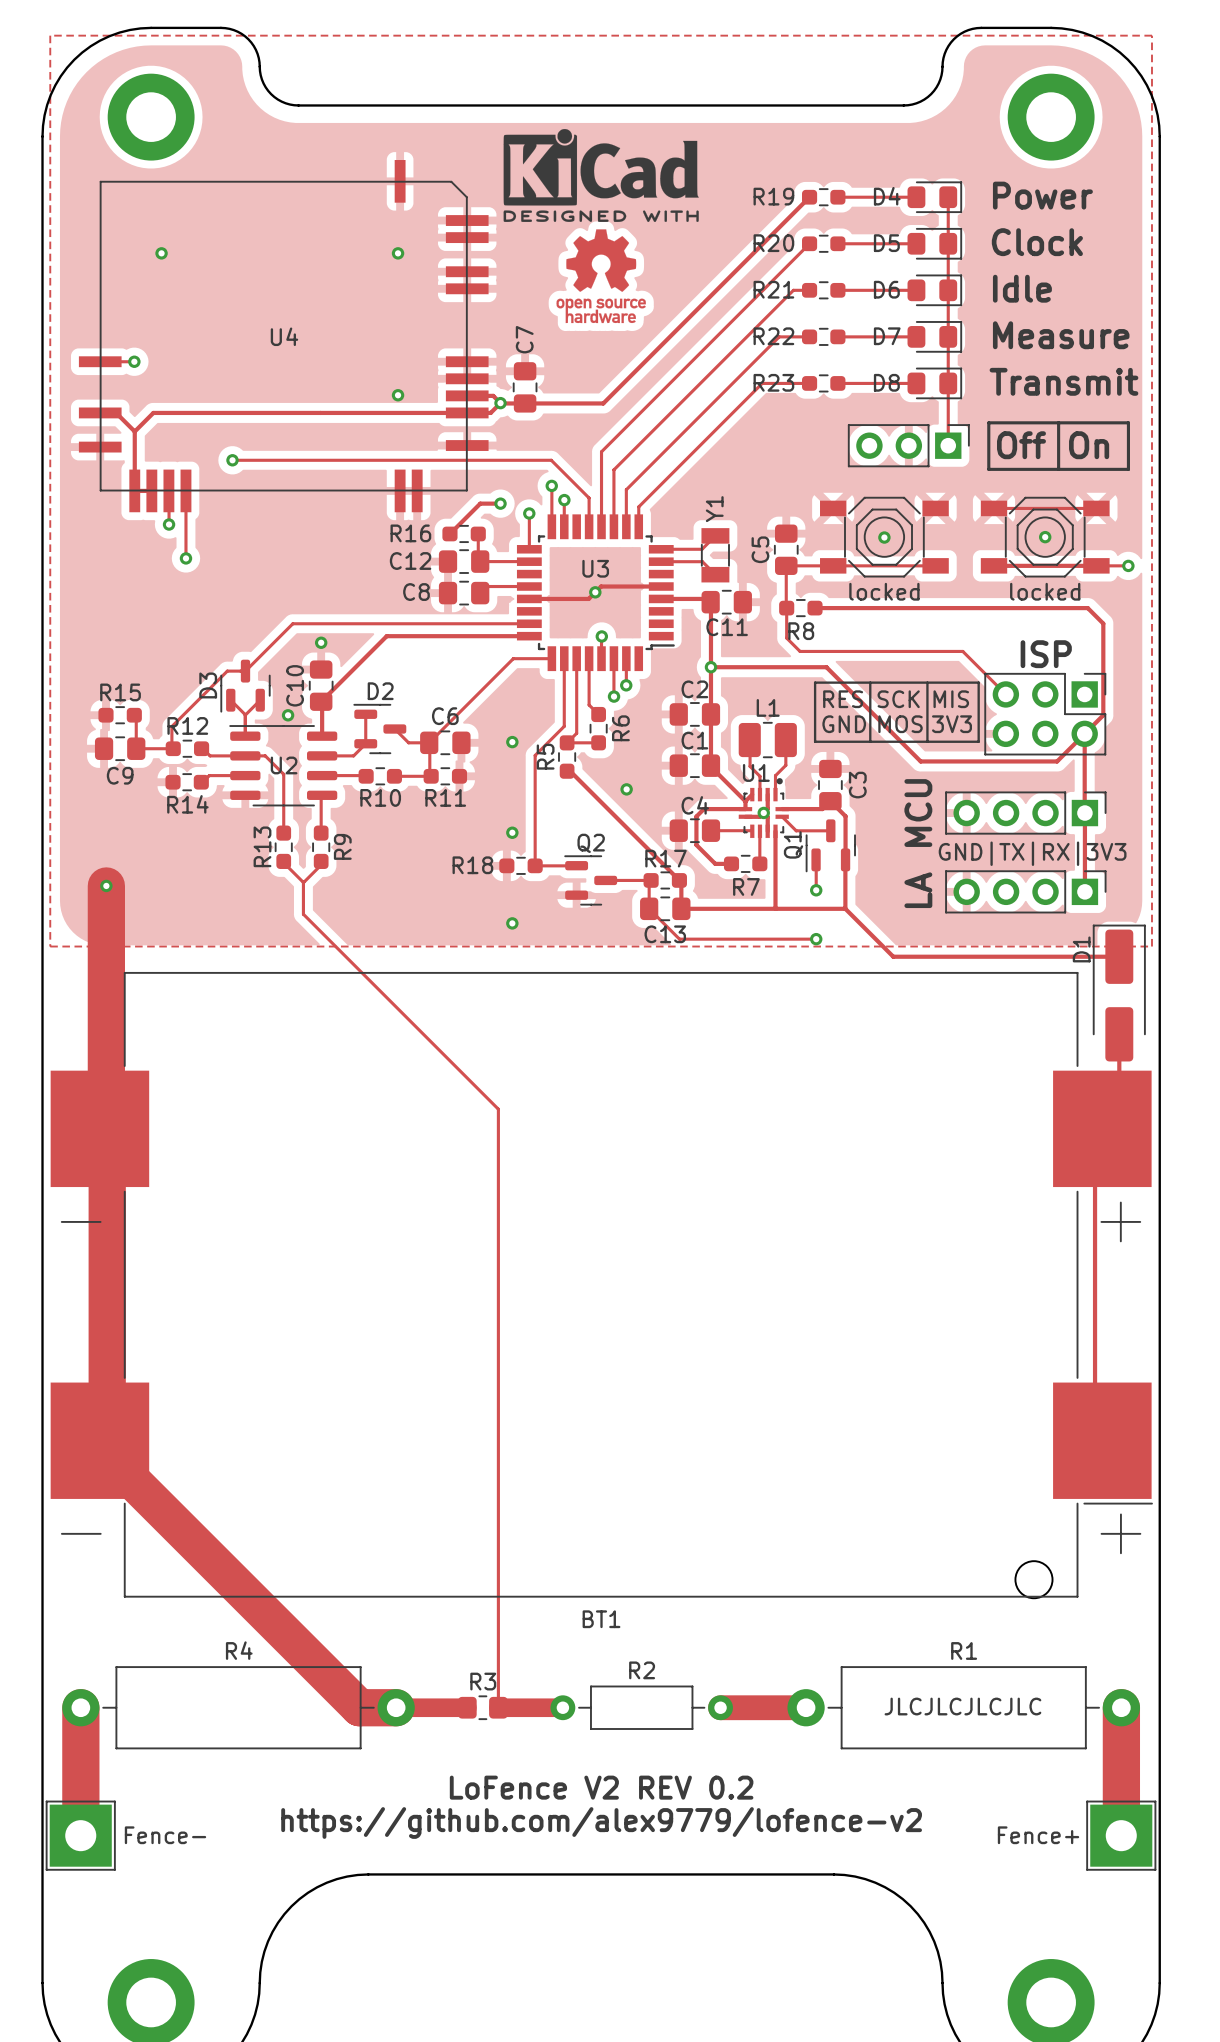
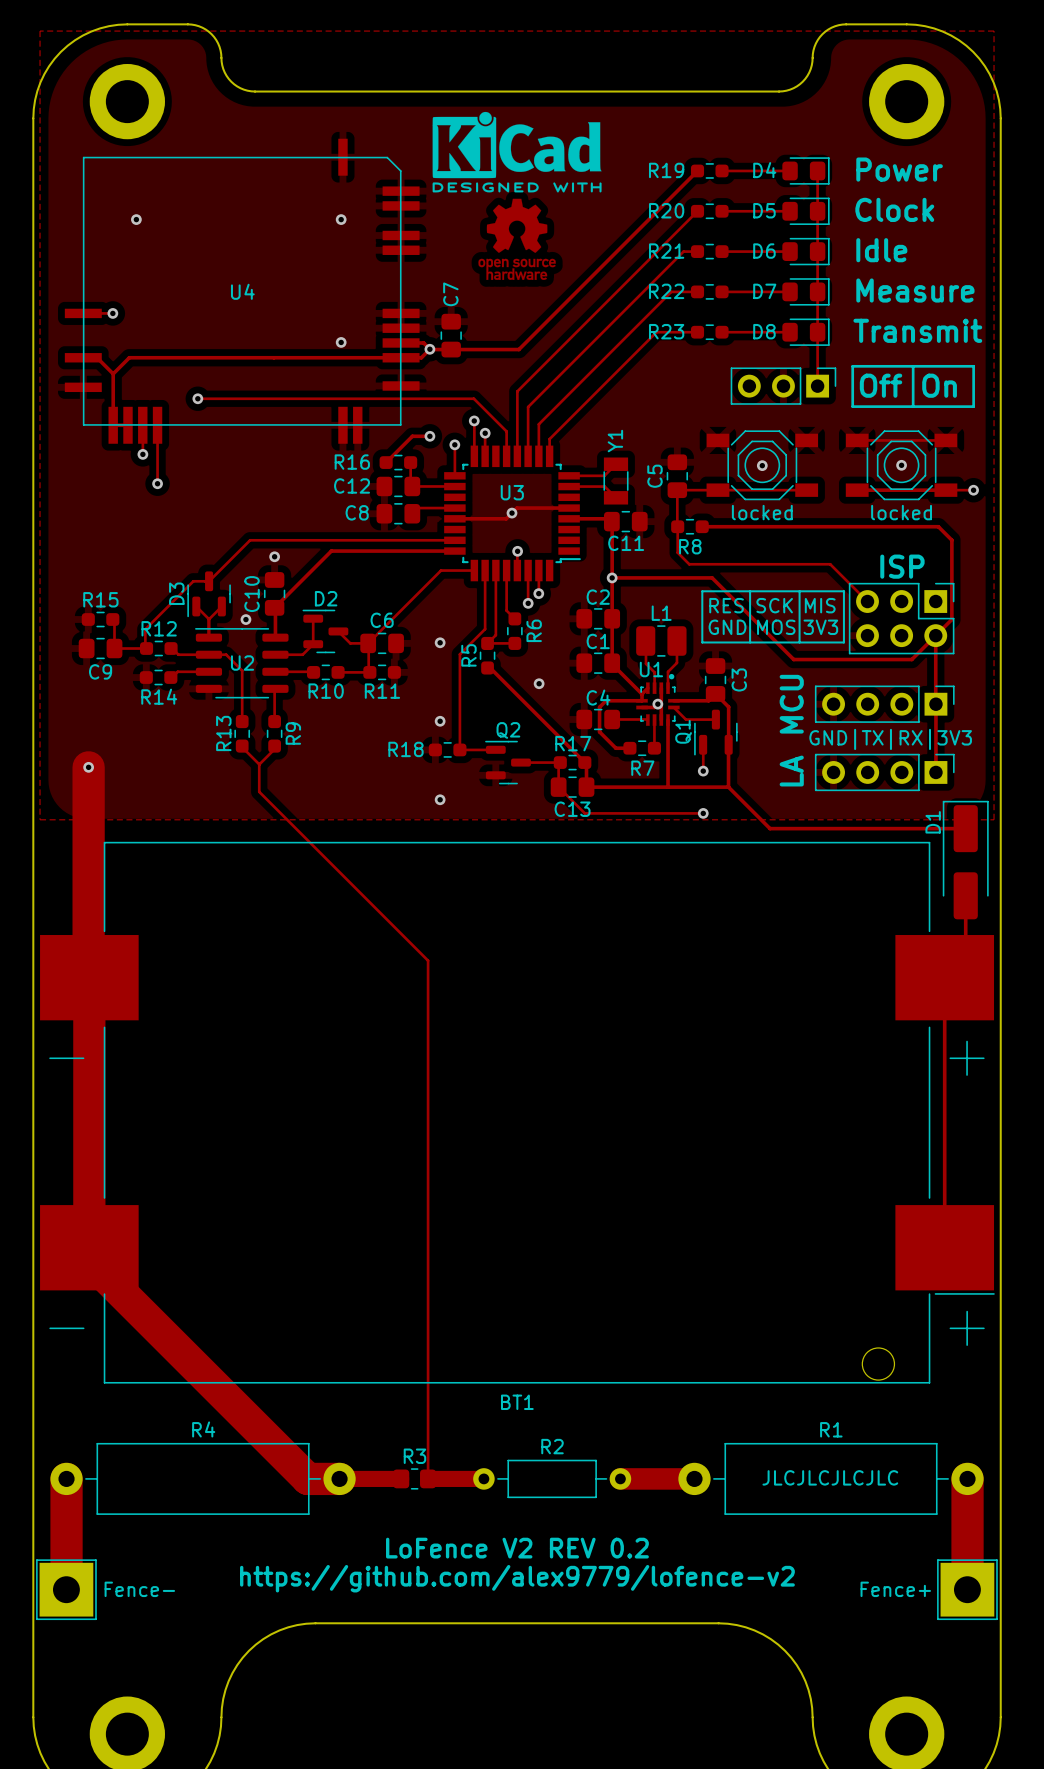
BT1 footprint: [50, 971, 1153, 1599] -> [40, 841, 995, 1384]

